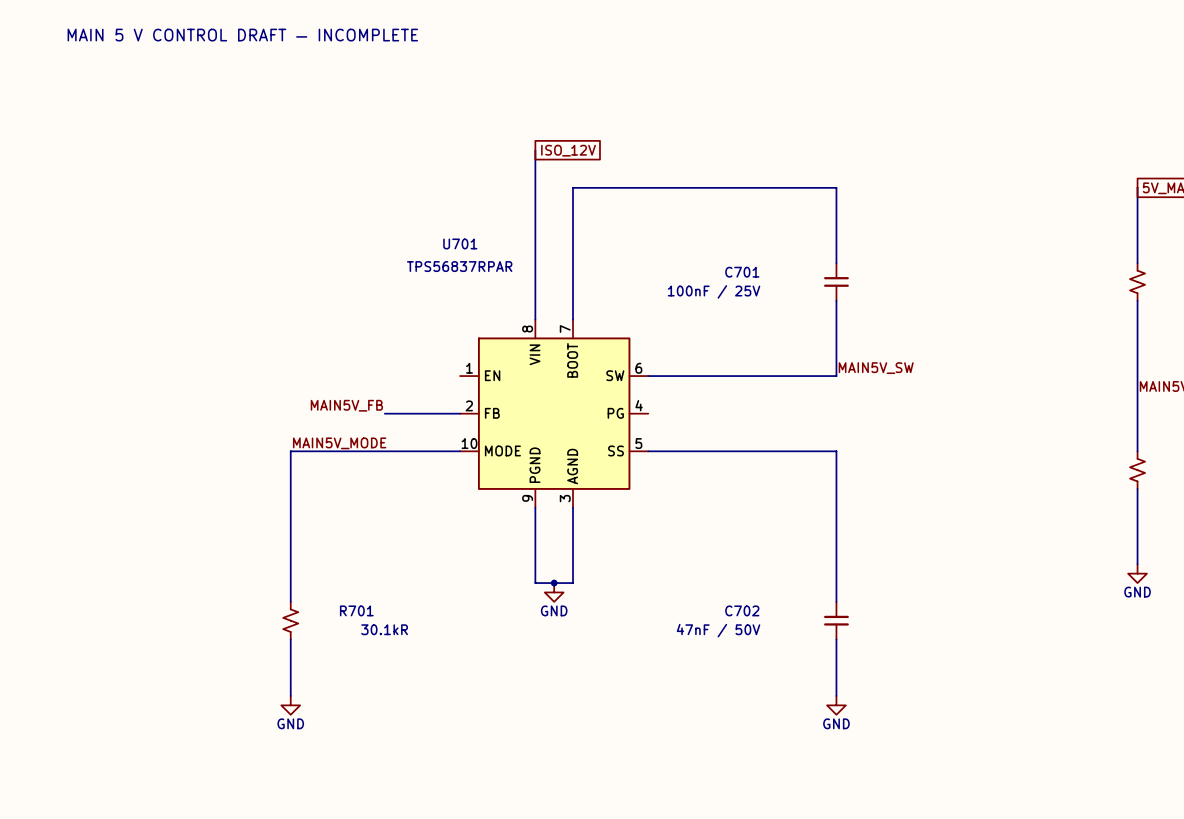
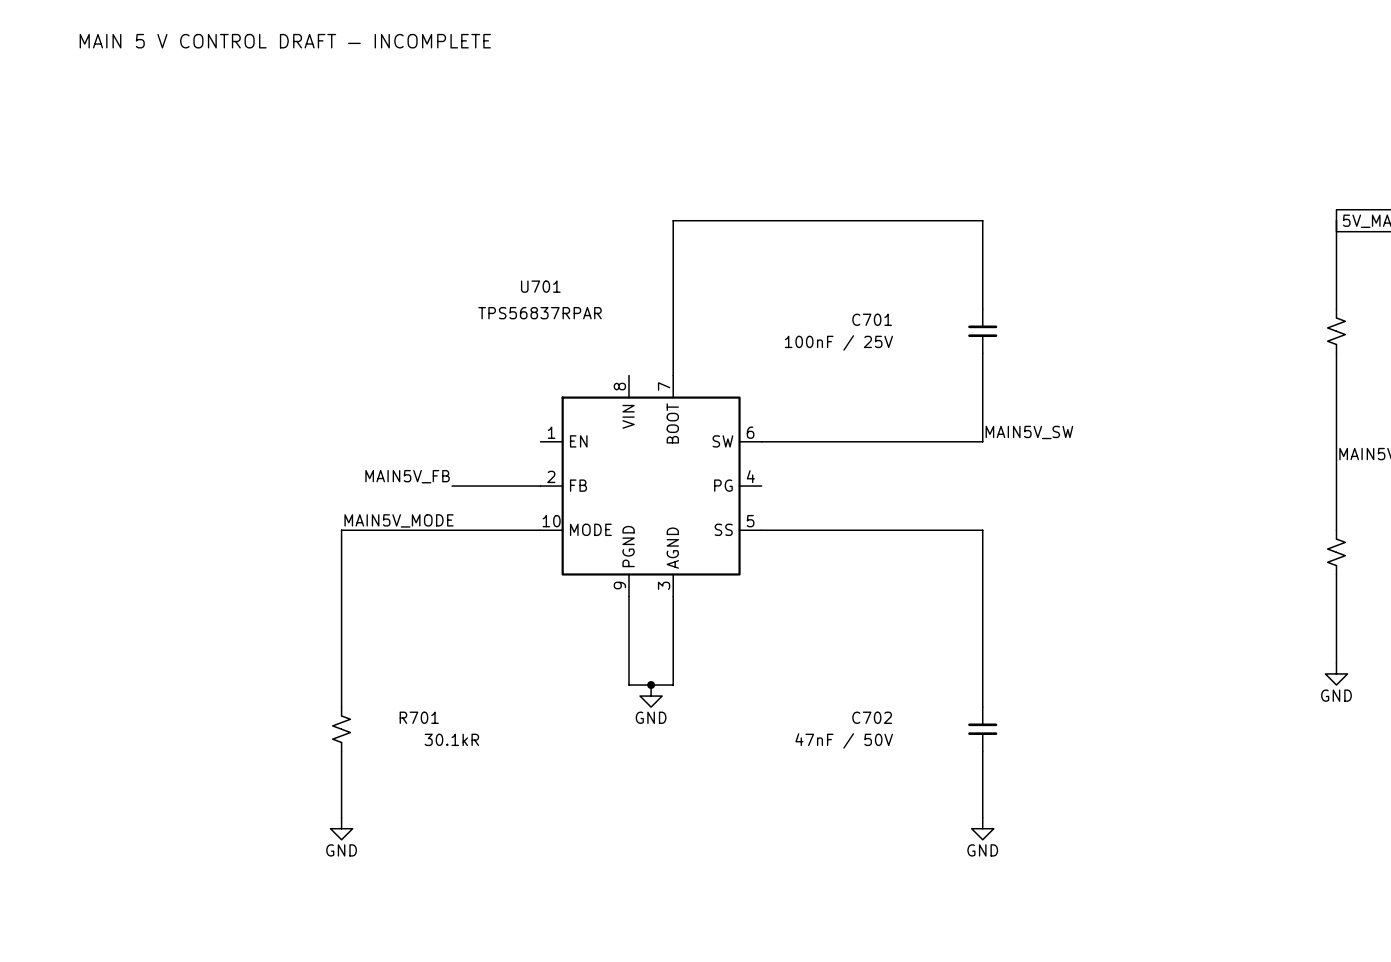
wire: (535, 150) (535, 319) -> none
global label: ISO_12V (568, 150) -> none

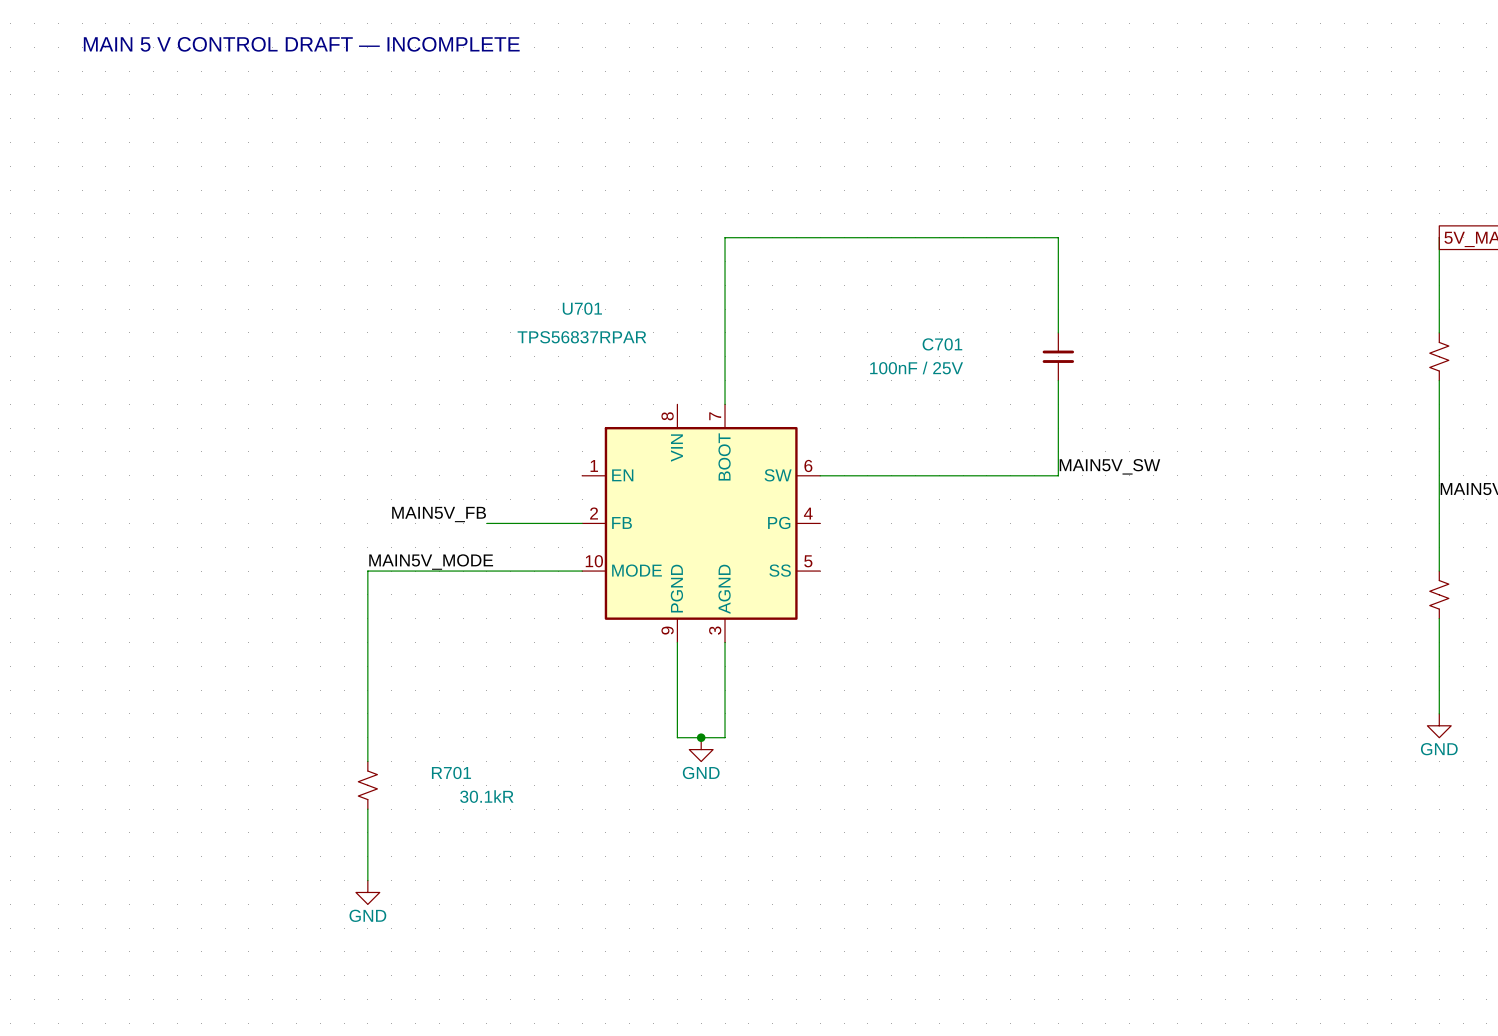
wire: (761, 530) (982, 530) (982, 707) -> none
C702: 47nF / 50V (982, 729) -> none
wire: (982, 751) (982, 817) -> none
power symbol: GND (982, 828) -> none

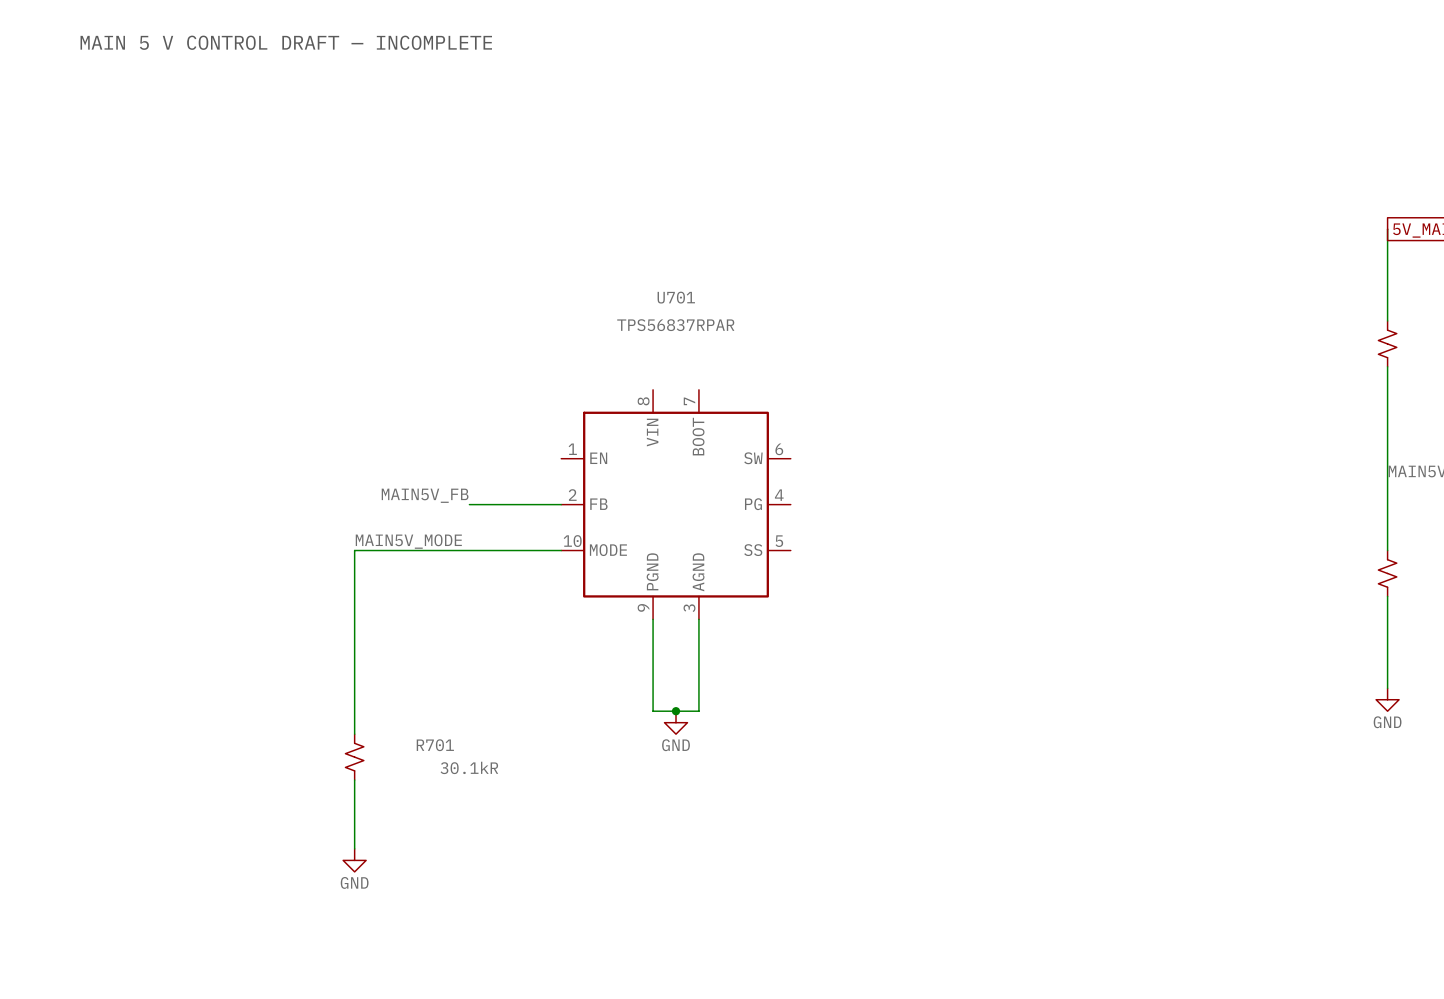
U701 name position: U701 (582, 308) -> U701 (676, 297)
wire: (1058, 332) (1058, 237) (725, 237) (725, 404) -> none
U701 value position: TPS56837RPAR (581, 337) -> TPS56837RPAR (675, 325)
C701: 100nF / 25V (1058, 356) -> none
wire: (1058, 380) (1058, 475) (820, 475) -> none
label: MAIN5V_SW (1109, 466) -> none

